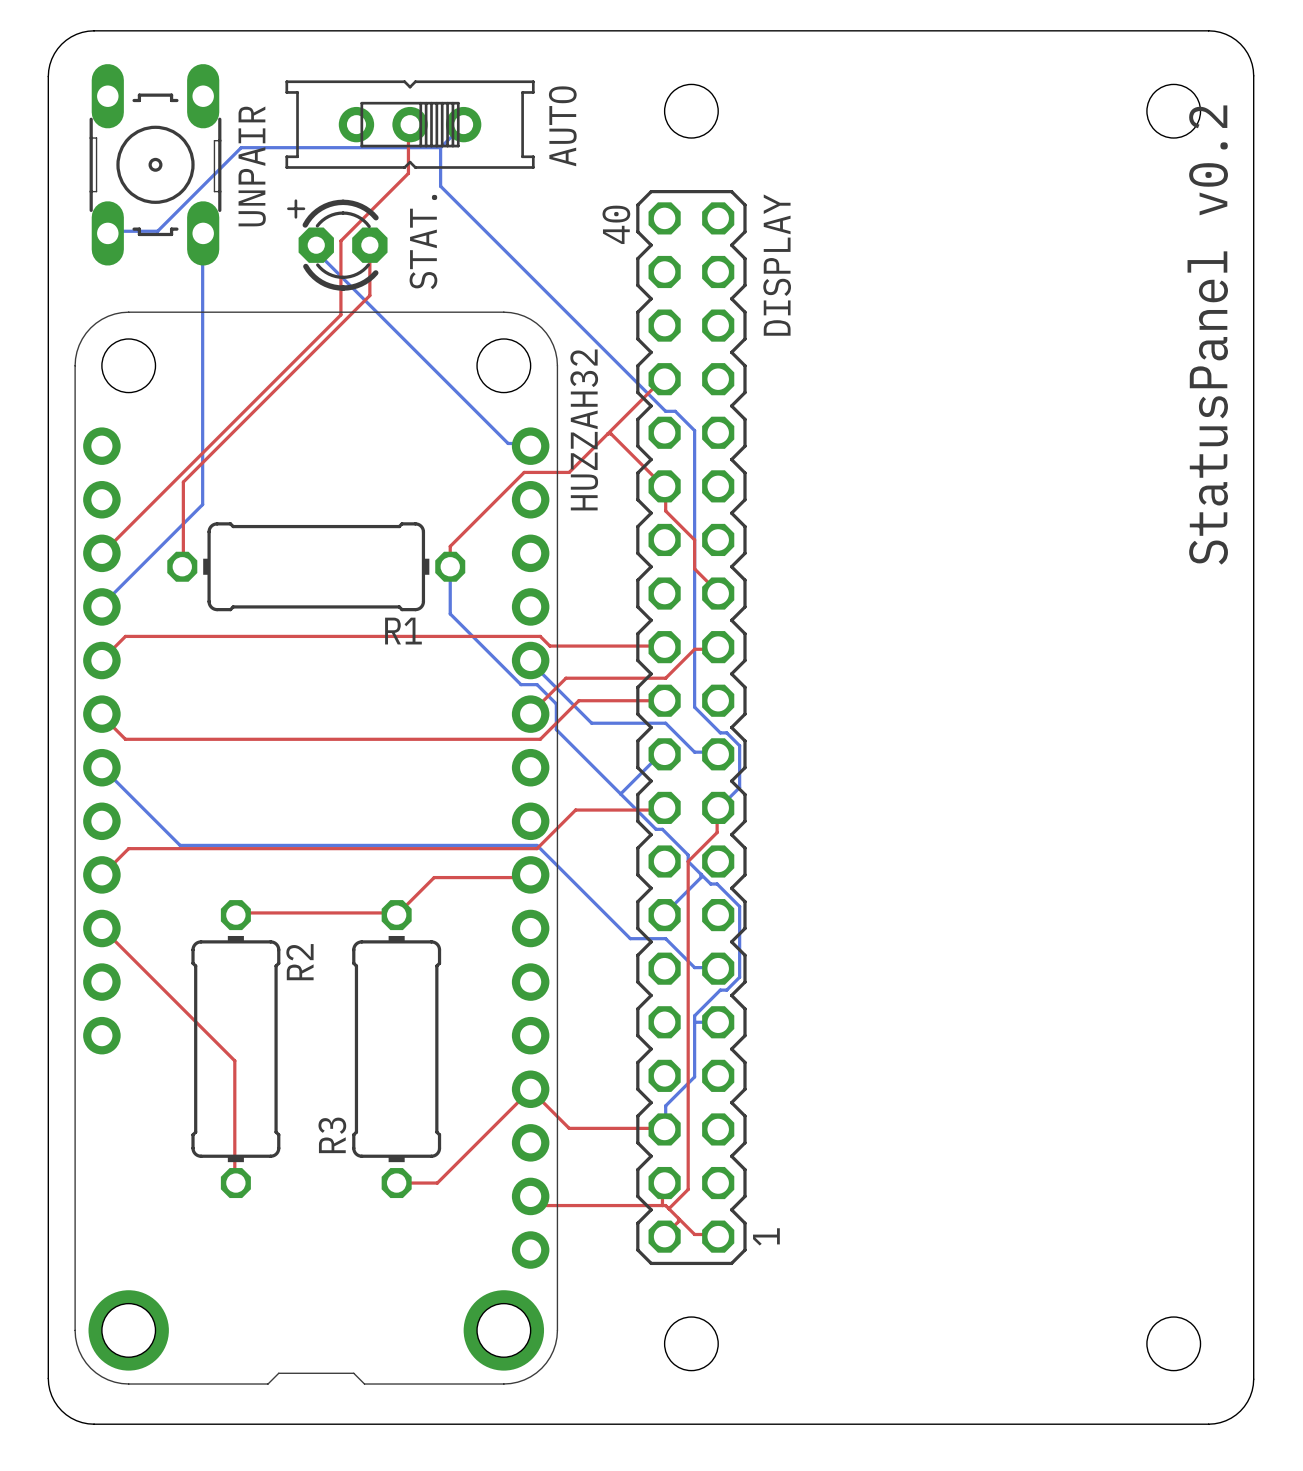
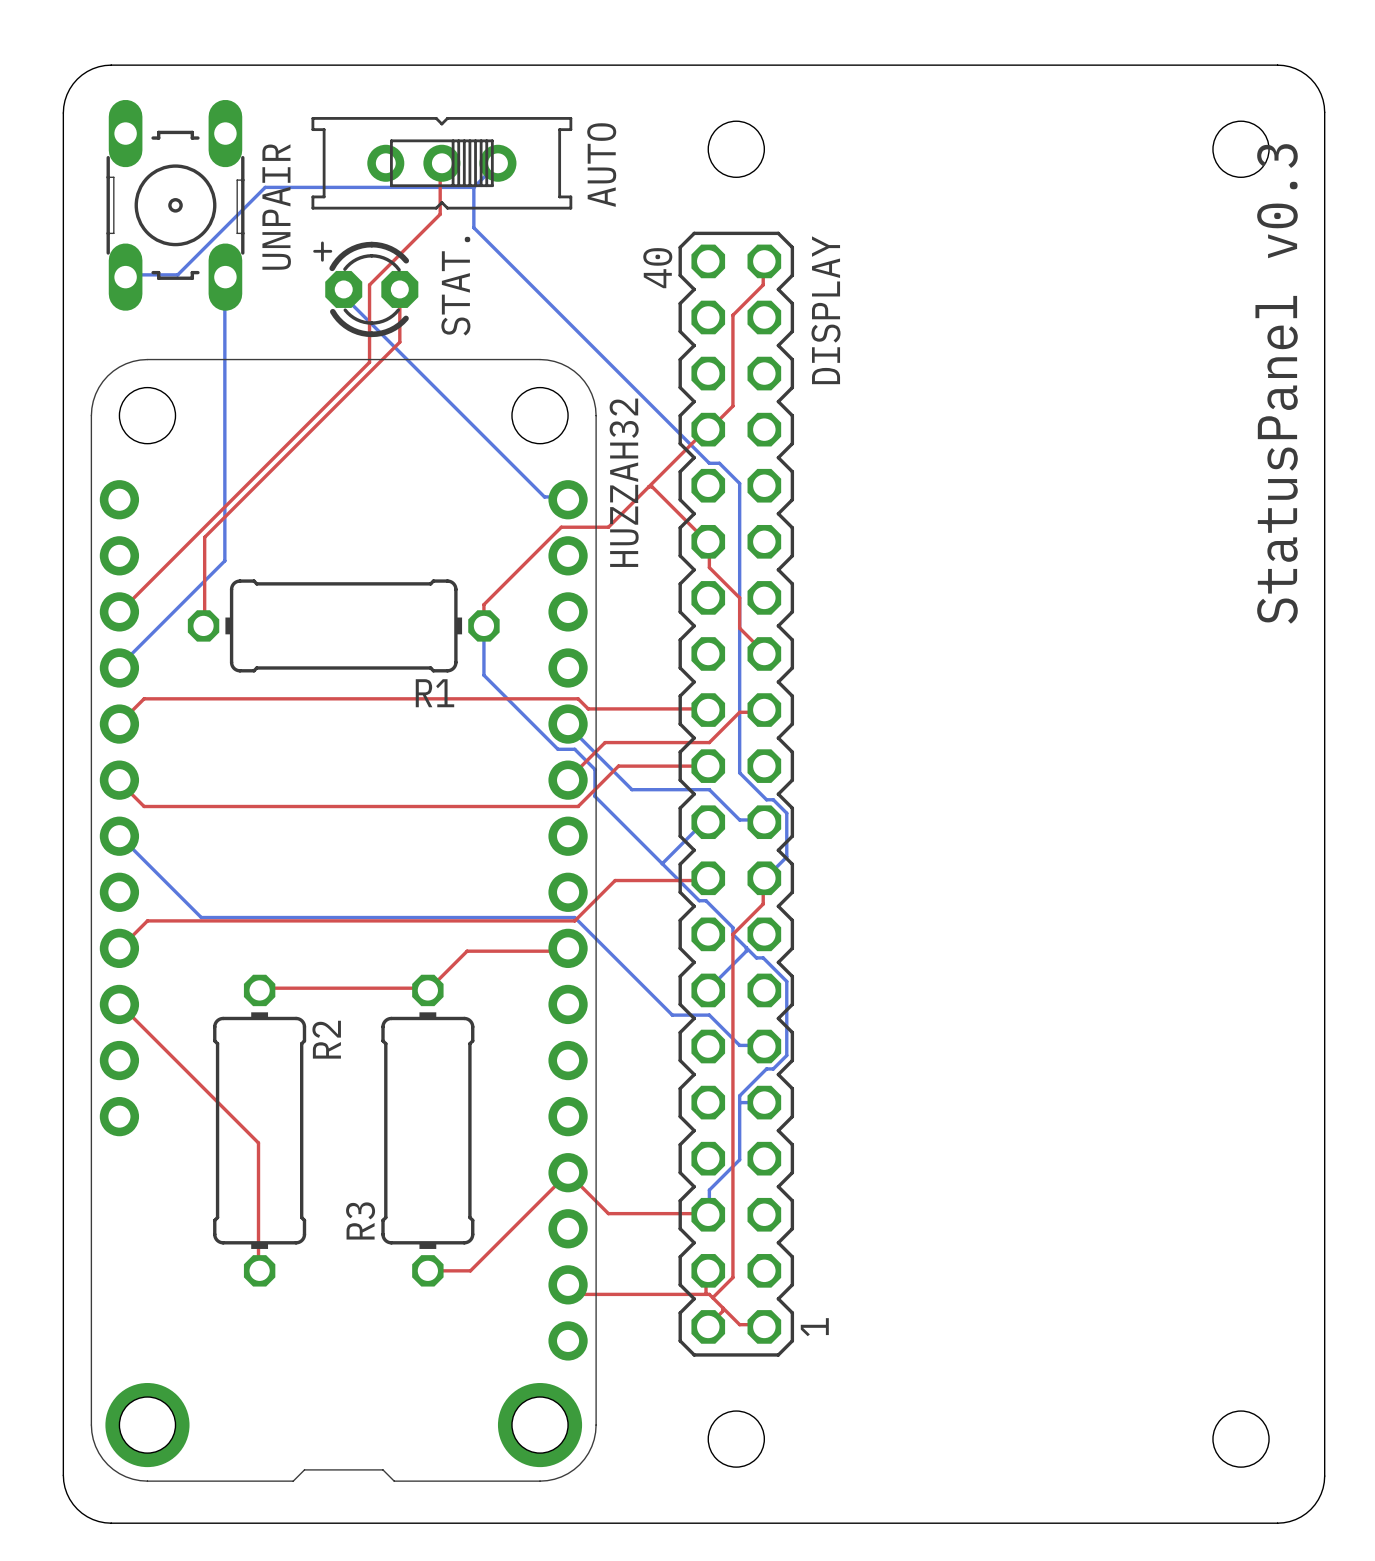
top track: none -> (764, 261) (763, 284) (732, 315) (732, 406) (708, 429)
text: StatusPanel v0.2 (1207, 334) -> StatusPanel v0.3 (1276, 383)

